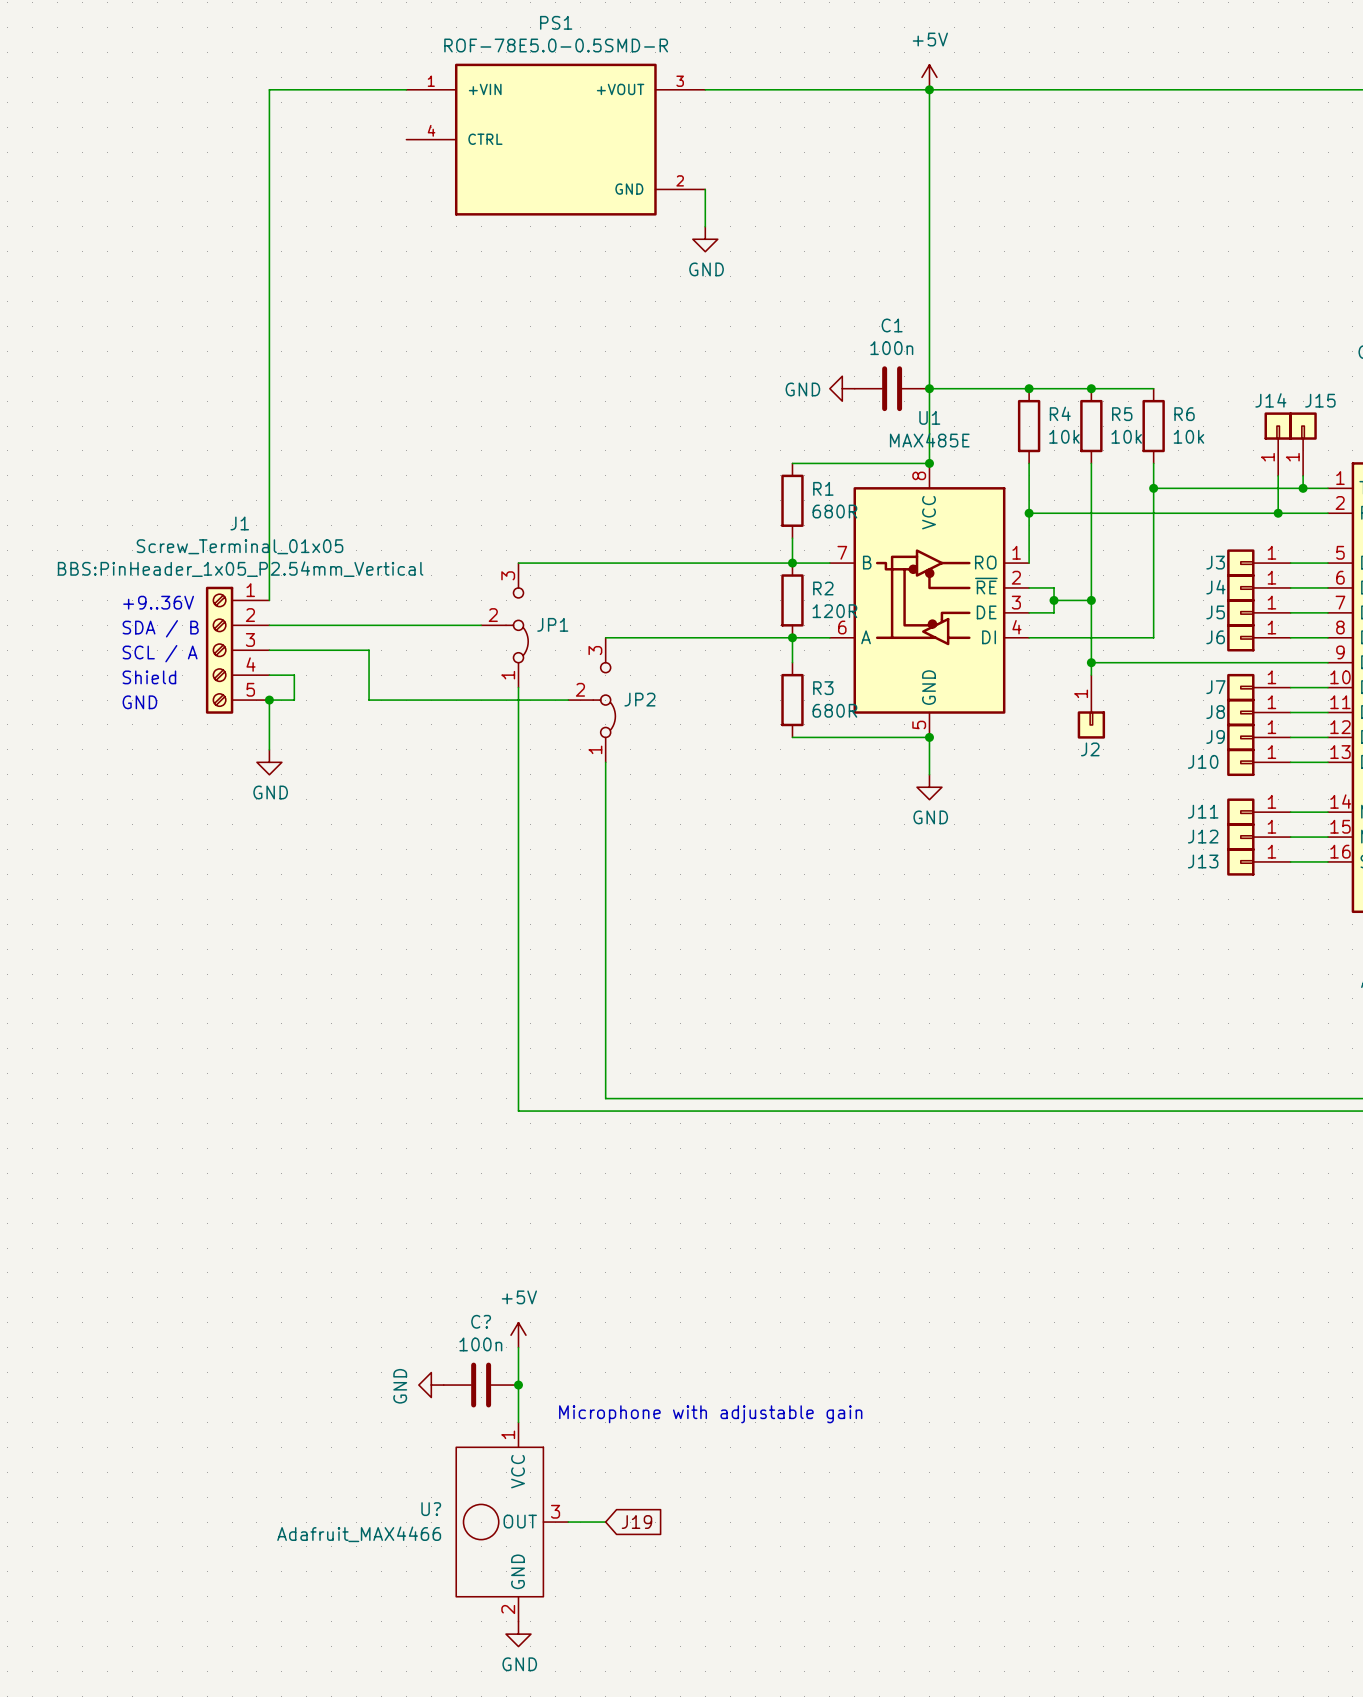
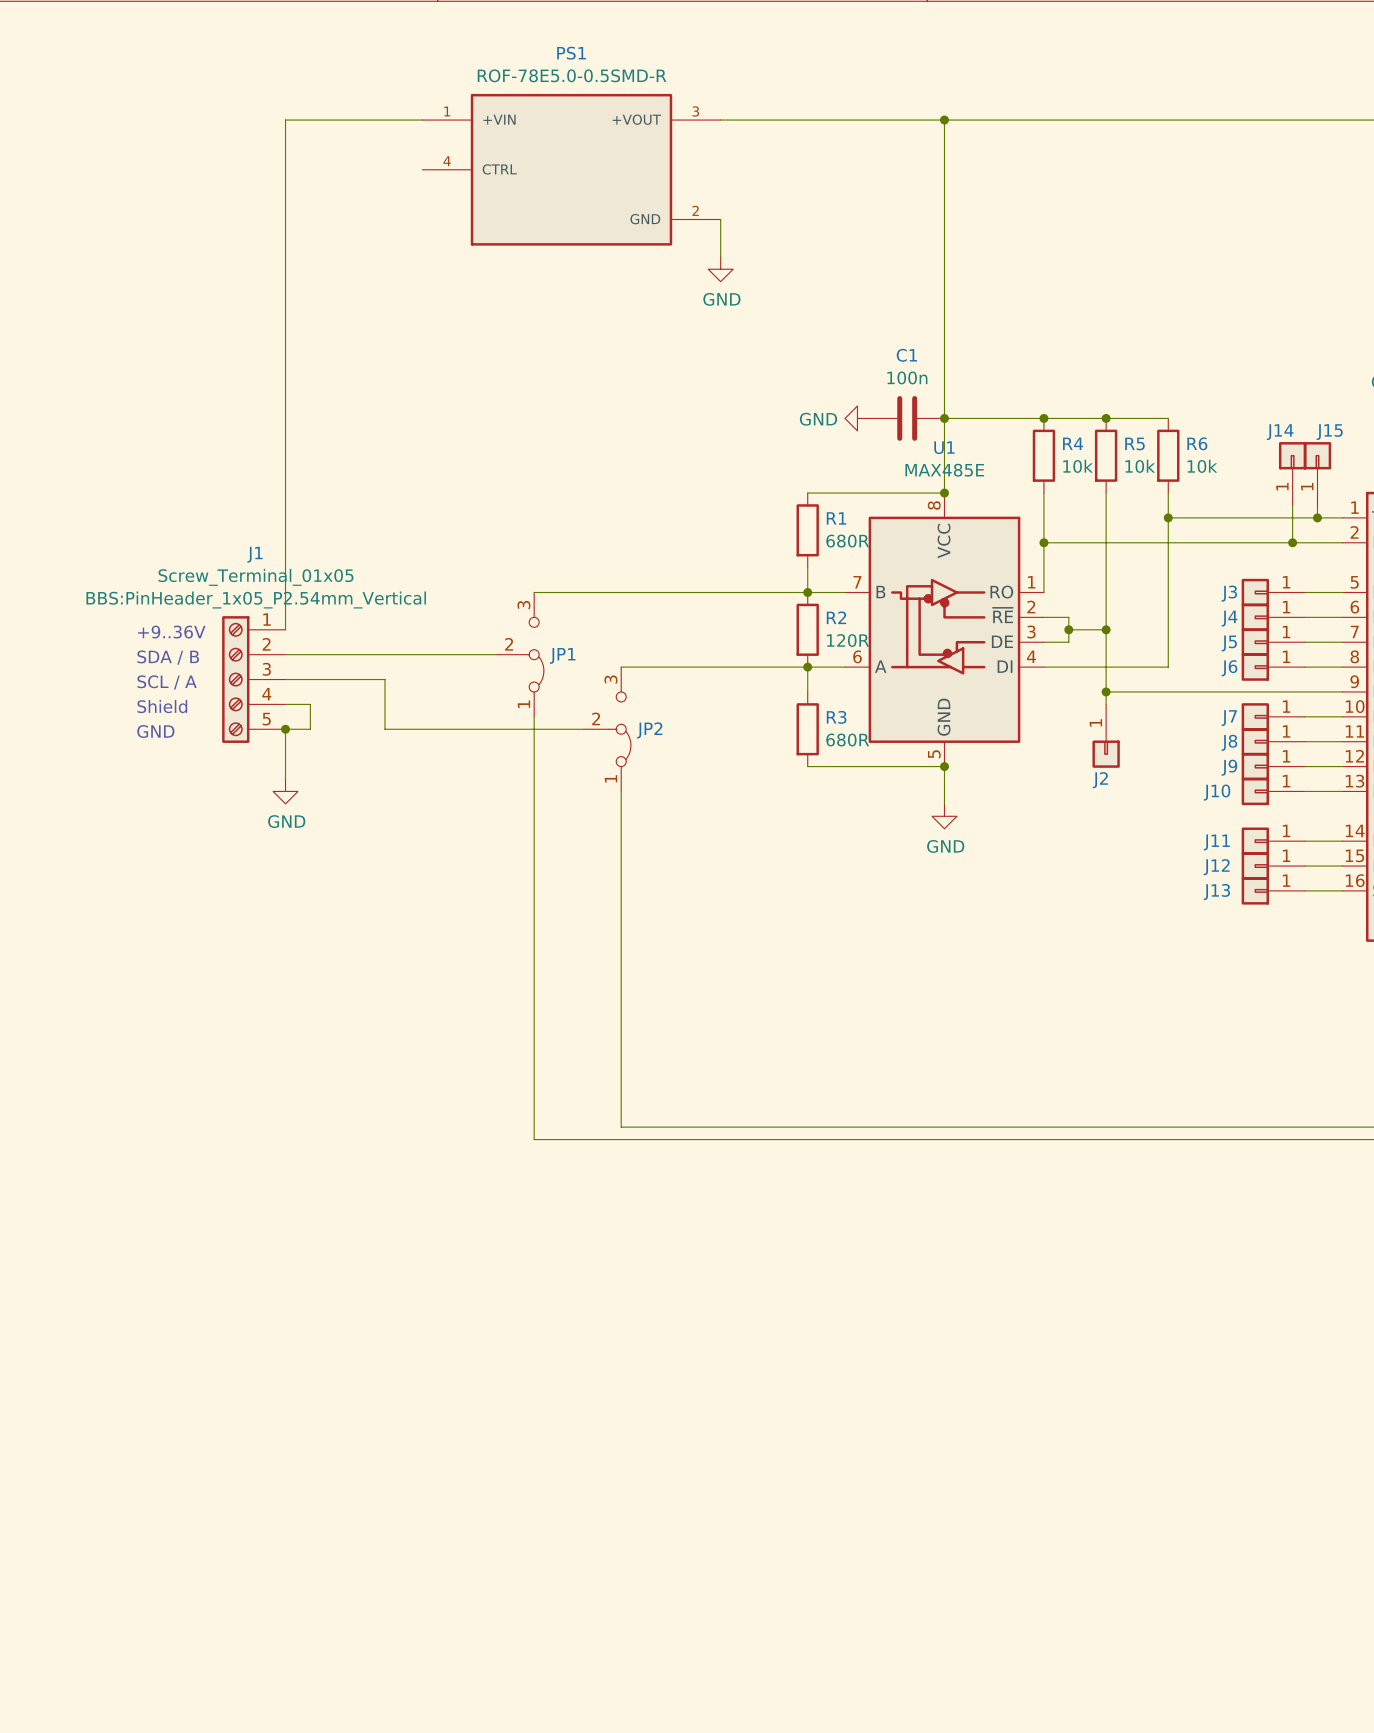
power symbol: +5V (929, 77) -> none
power symbol: +5V (518, 1335) -> none
wire: (518, 1347) (518, 1422) -> none
power symbol: GND (431, 1385) -> none
C?: 100n (481, 1385) -> none
junction: (518, 1385) -> none
text: Microphone with adjustable gain (710, 1414) -> none
U?: Adafruit_MAX4466 (512, 1522) -> none
wire: (568, 1522) (605, 1522) -> none
global label: J19 (636, 1522) -> none
power symbol: GND (518, 1634) -> none

